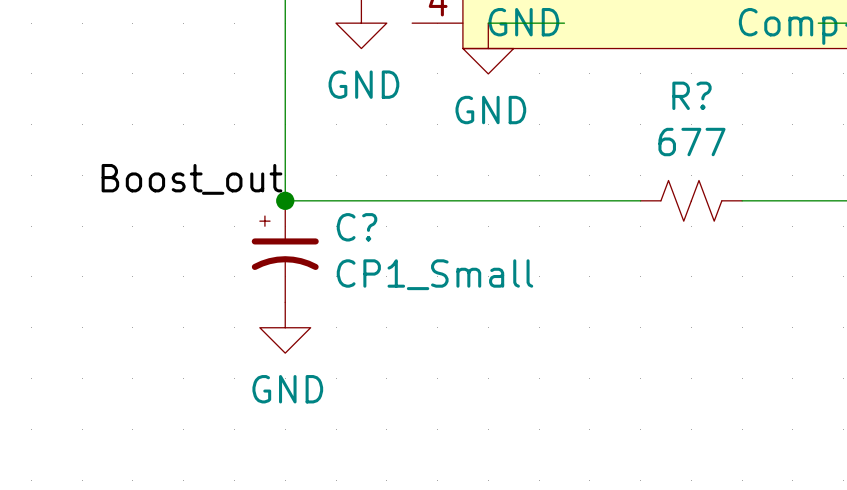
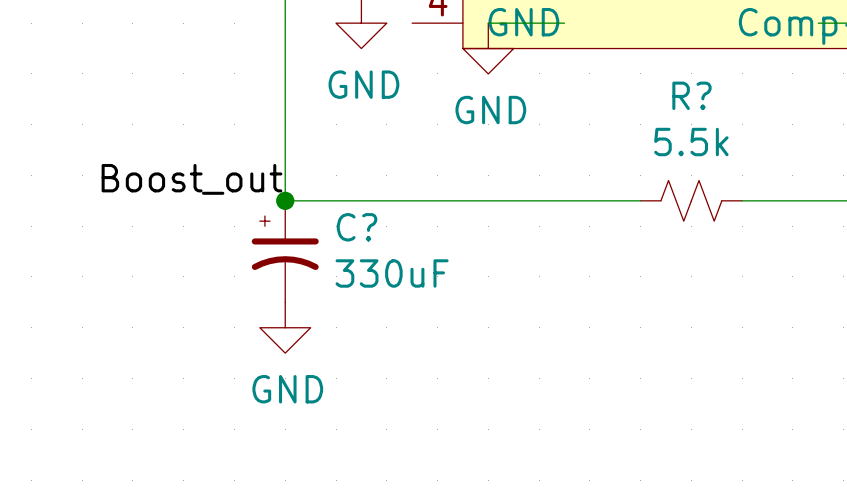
R? value: 677 (691, 142) -> 5.5k (691, 142)
C? value: CP1_Small (434, 274) -> 330uF (392, 273)

